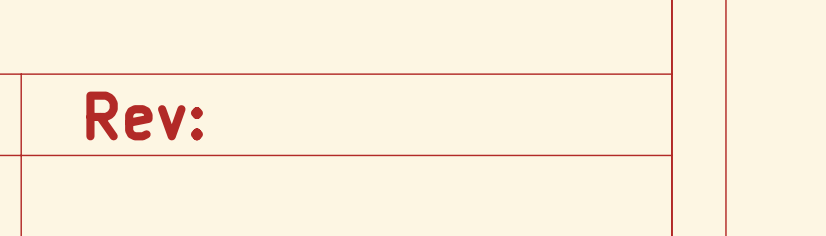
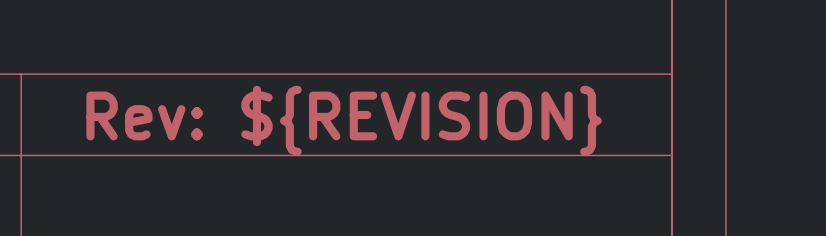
title block: Rev: (144, 115) -> Rev: ${REVISION} (344, 120)

